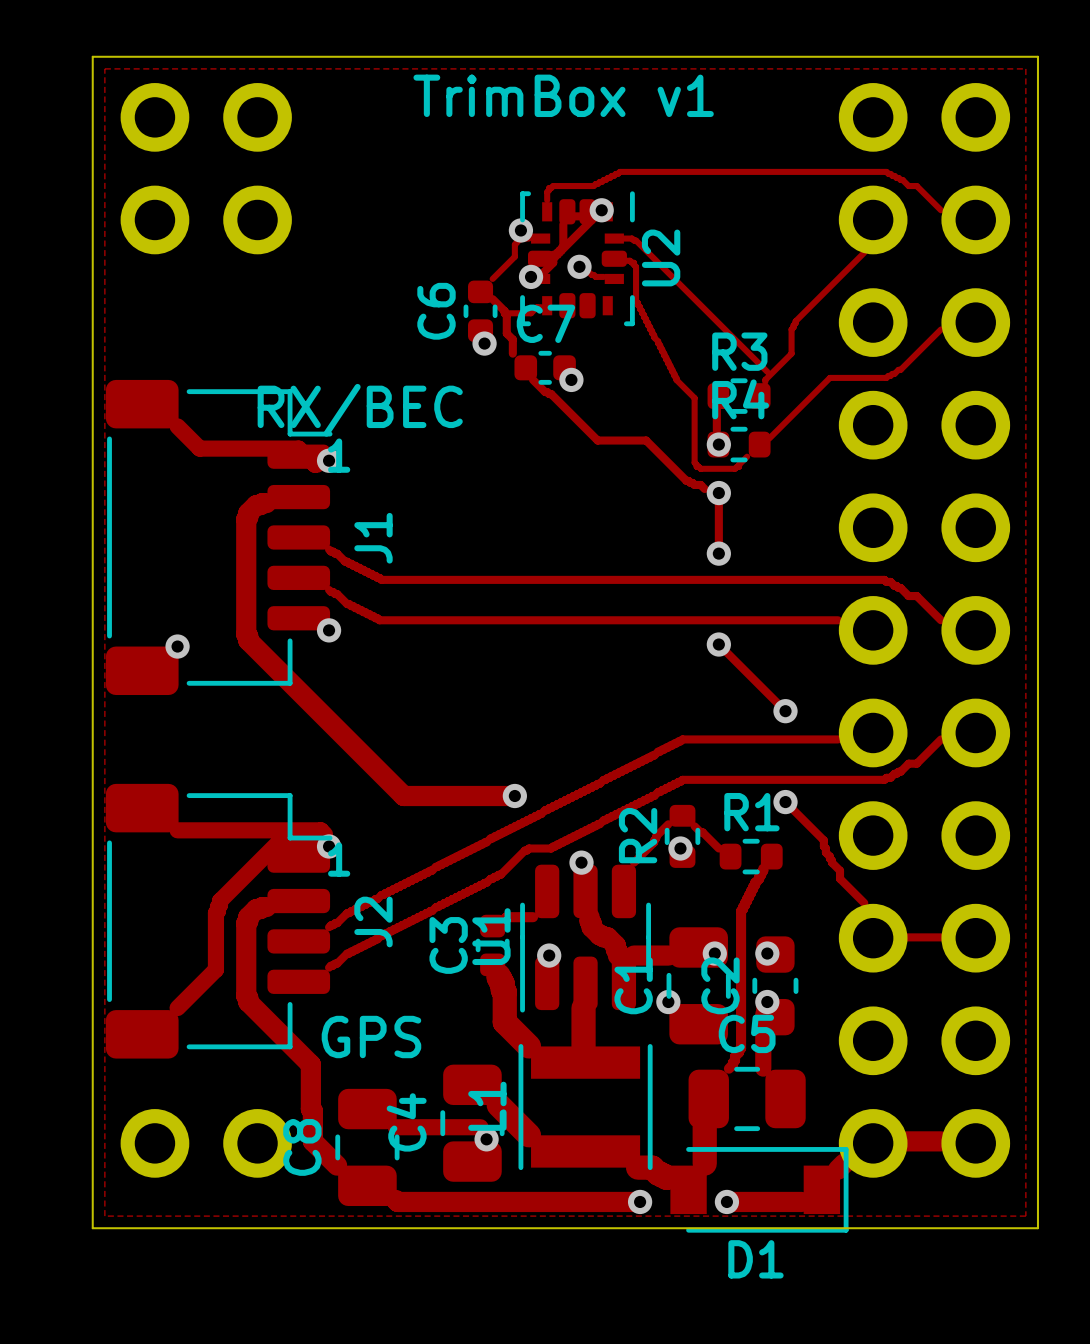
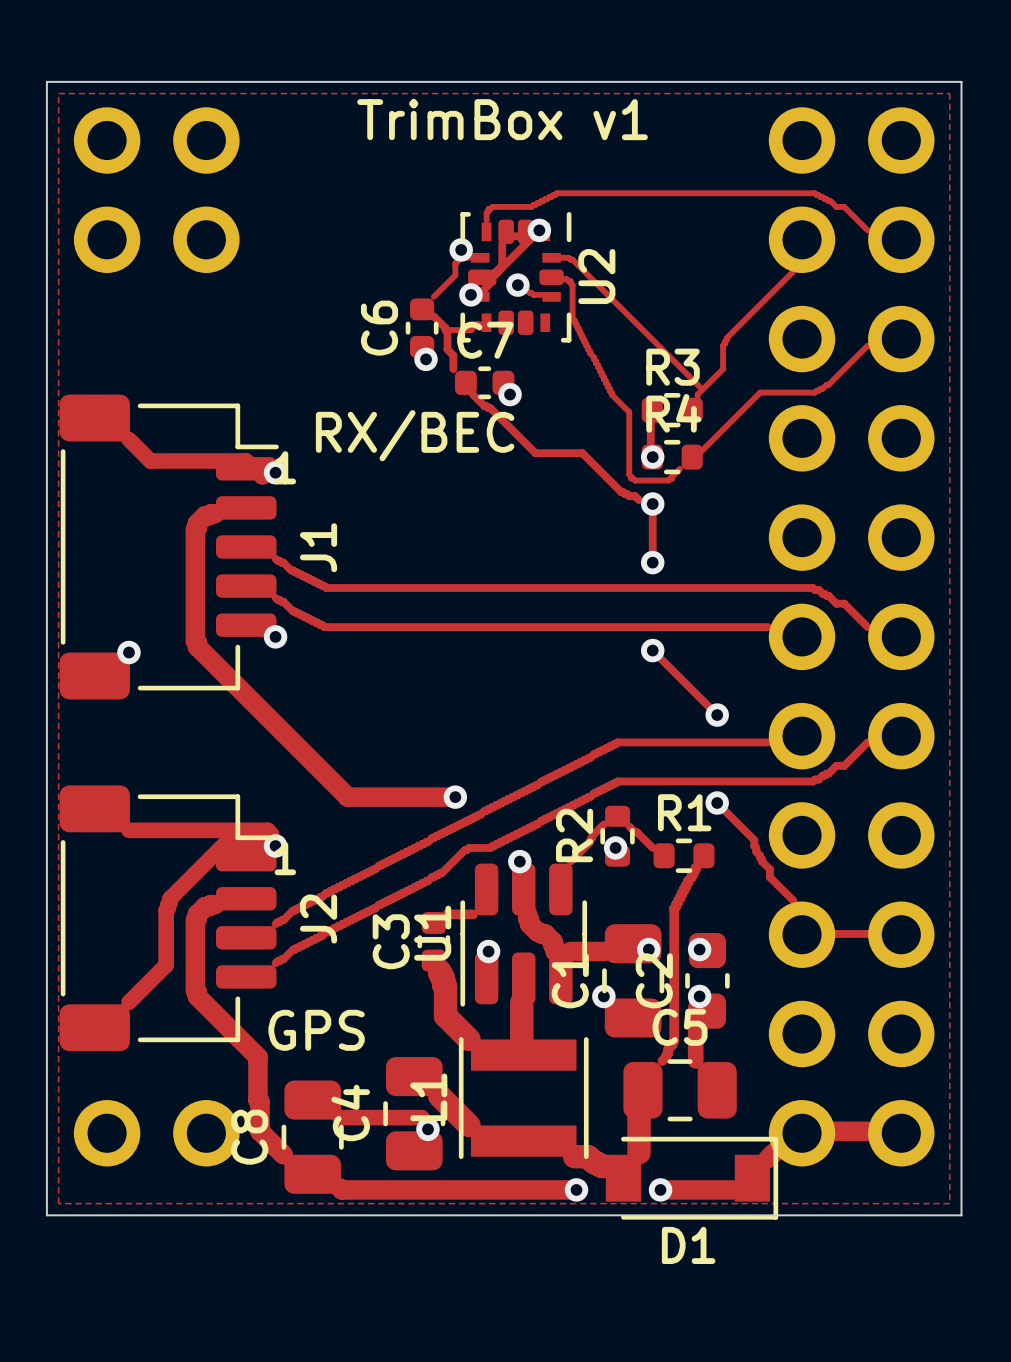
text position: RX/BEC (360, 410) -> RX/BEC (415, 435)

